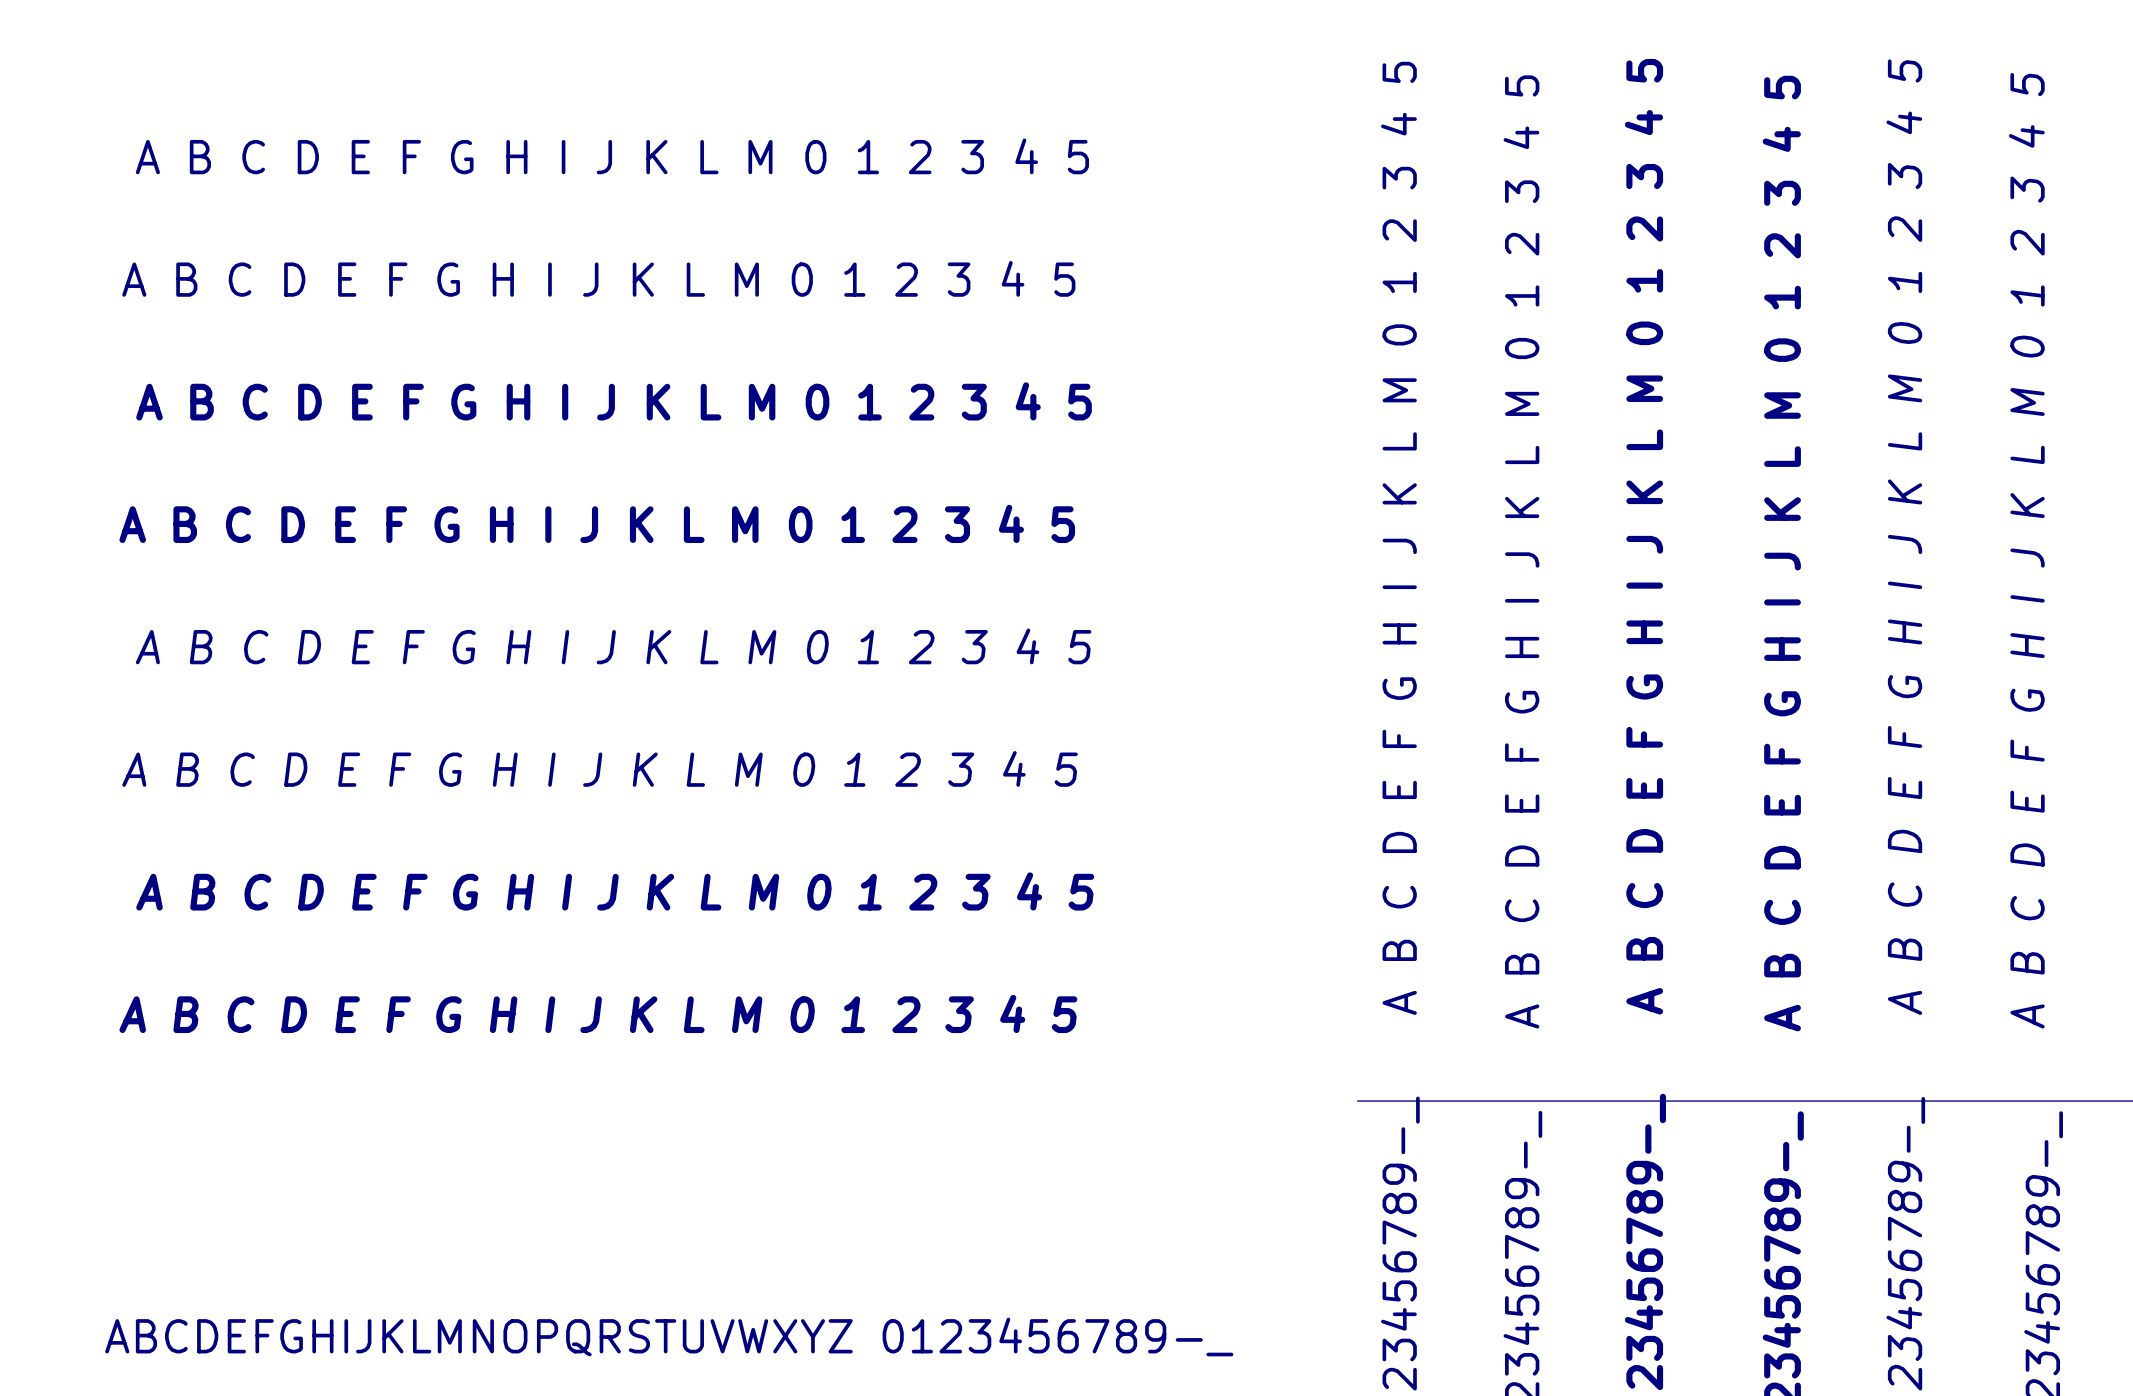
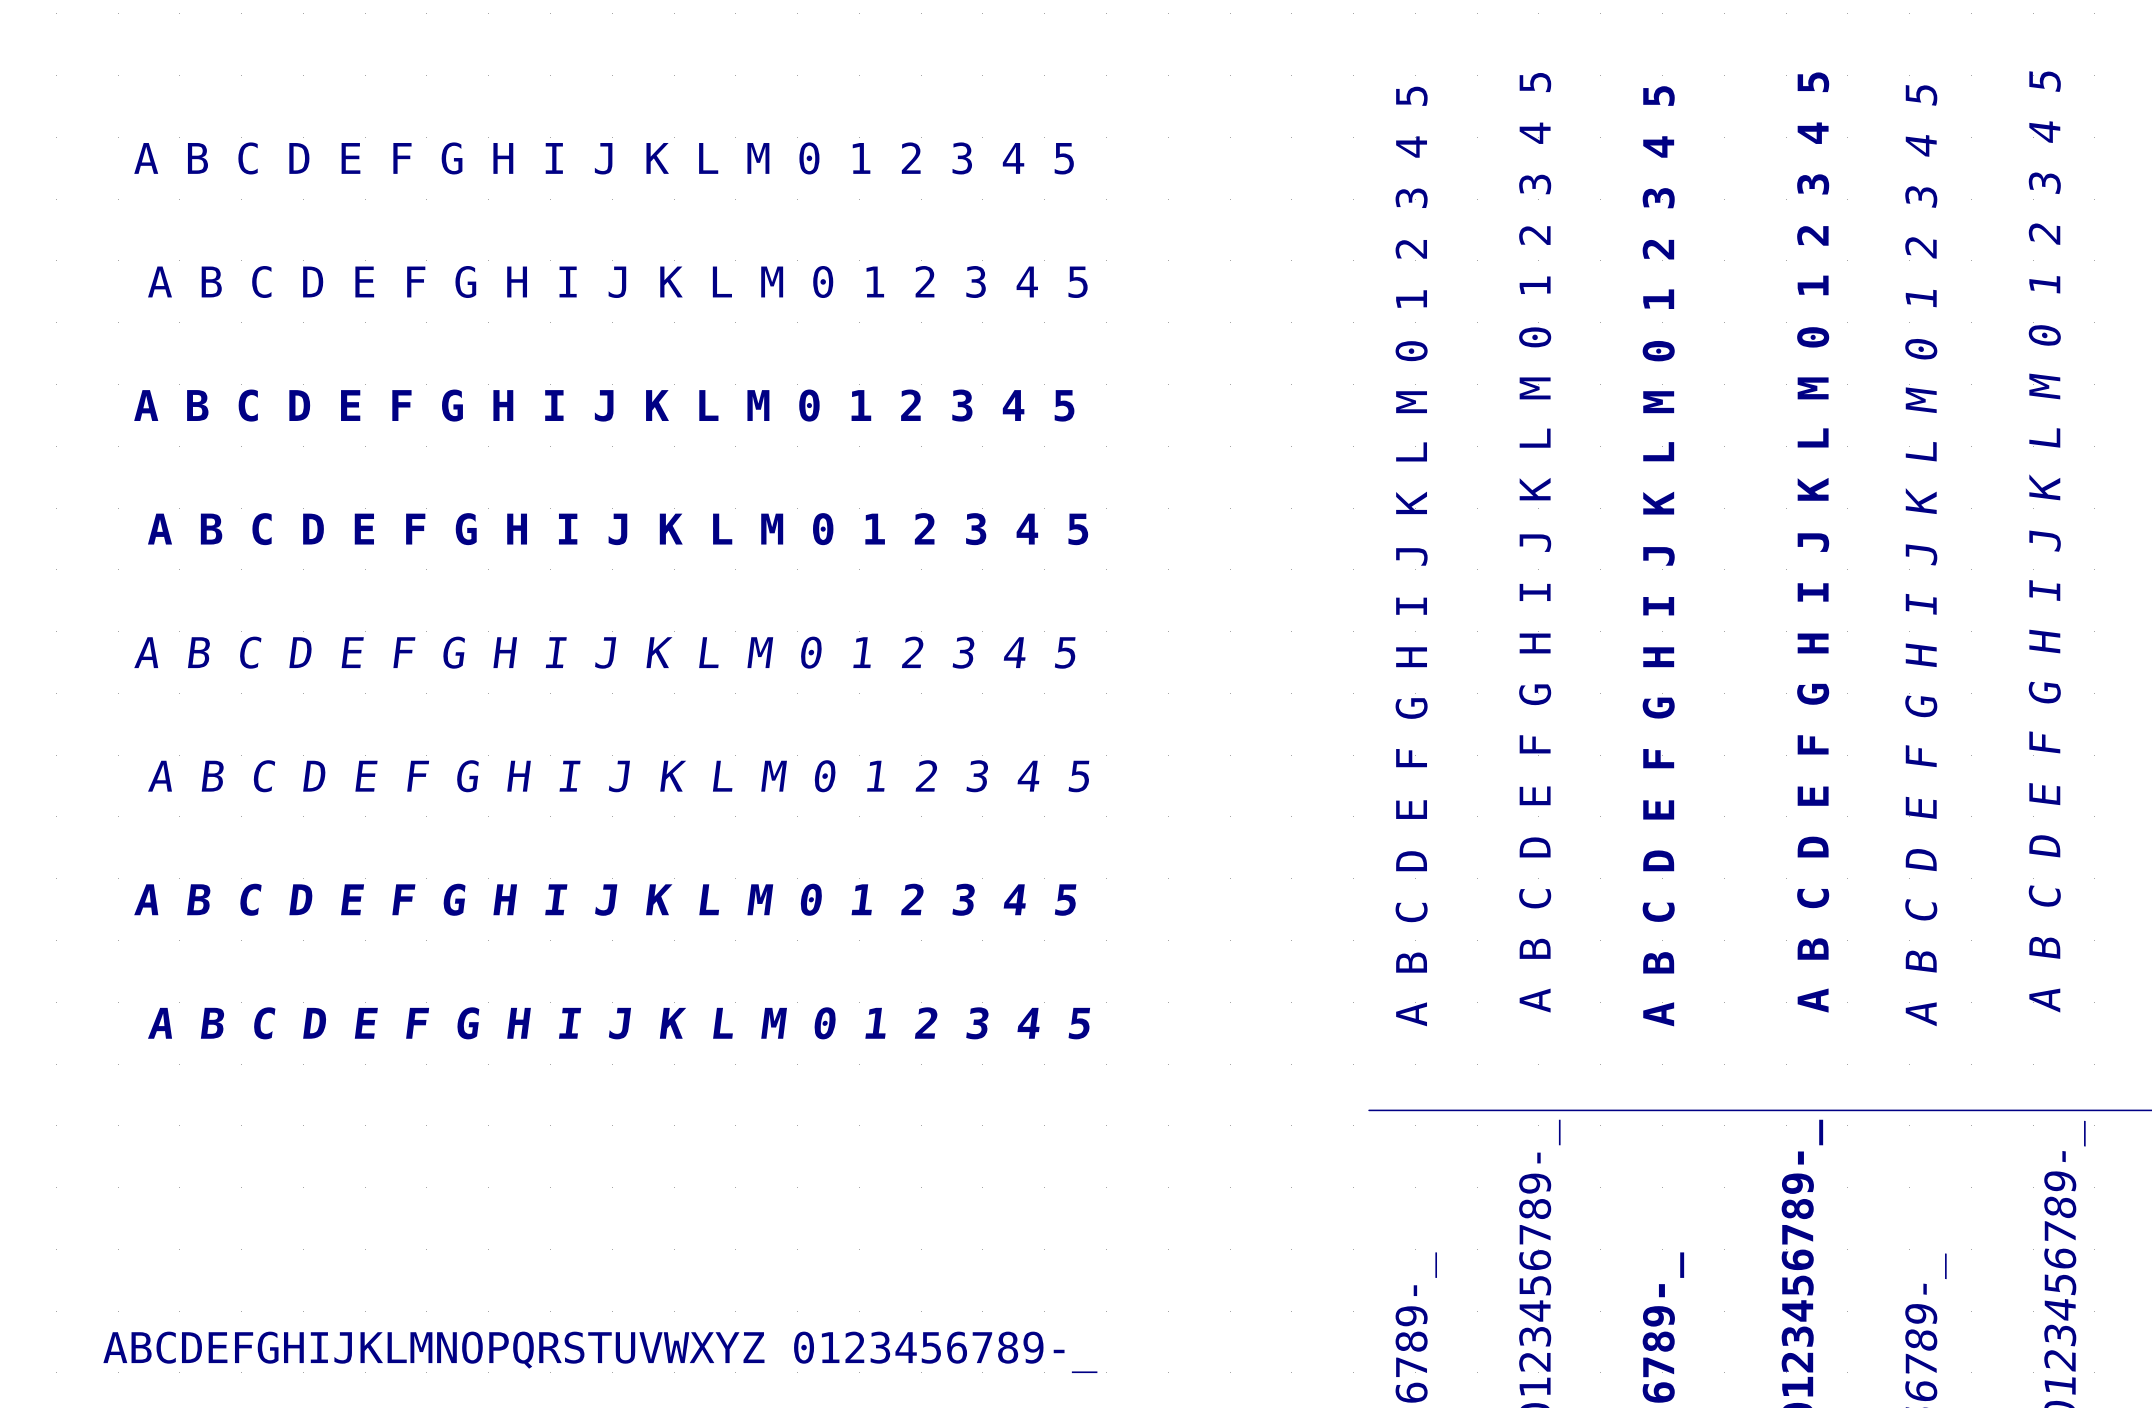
text position: A B C D E F G H I J K L M 0 1 2 3 4 5 (1781, 553) -> A B C D E F G H I J K L M 0 1 2 3 4 5 (1813, 542)

